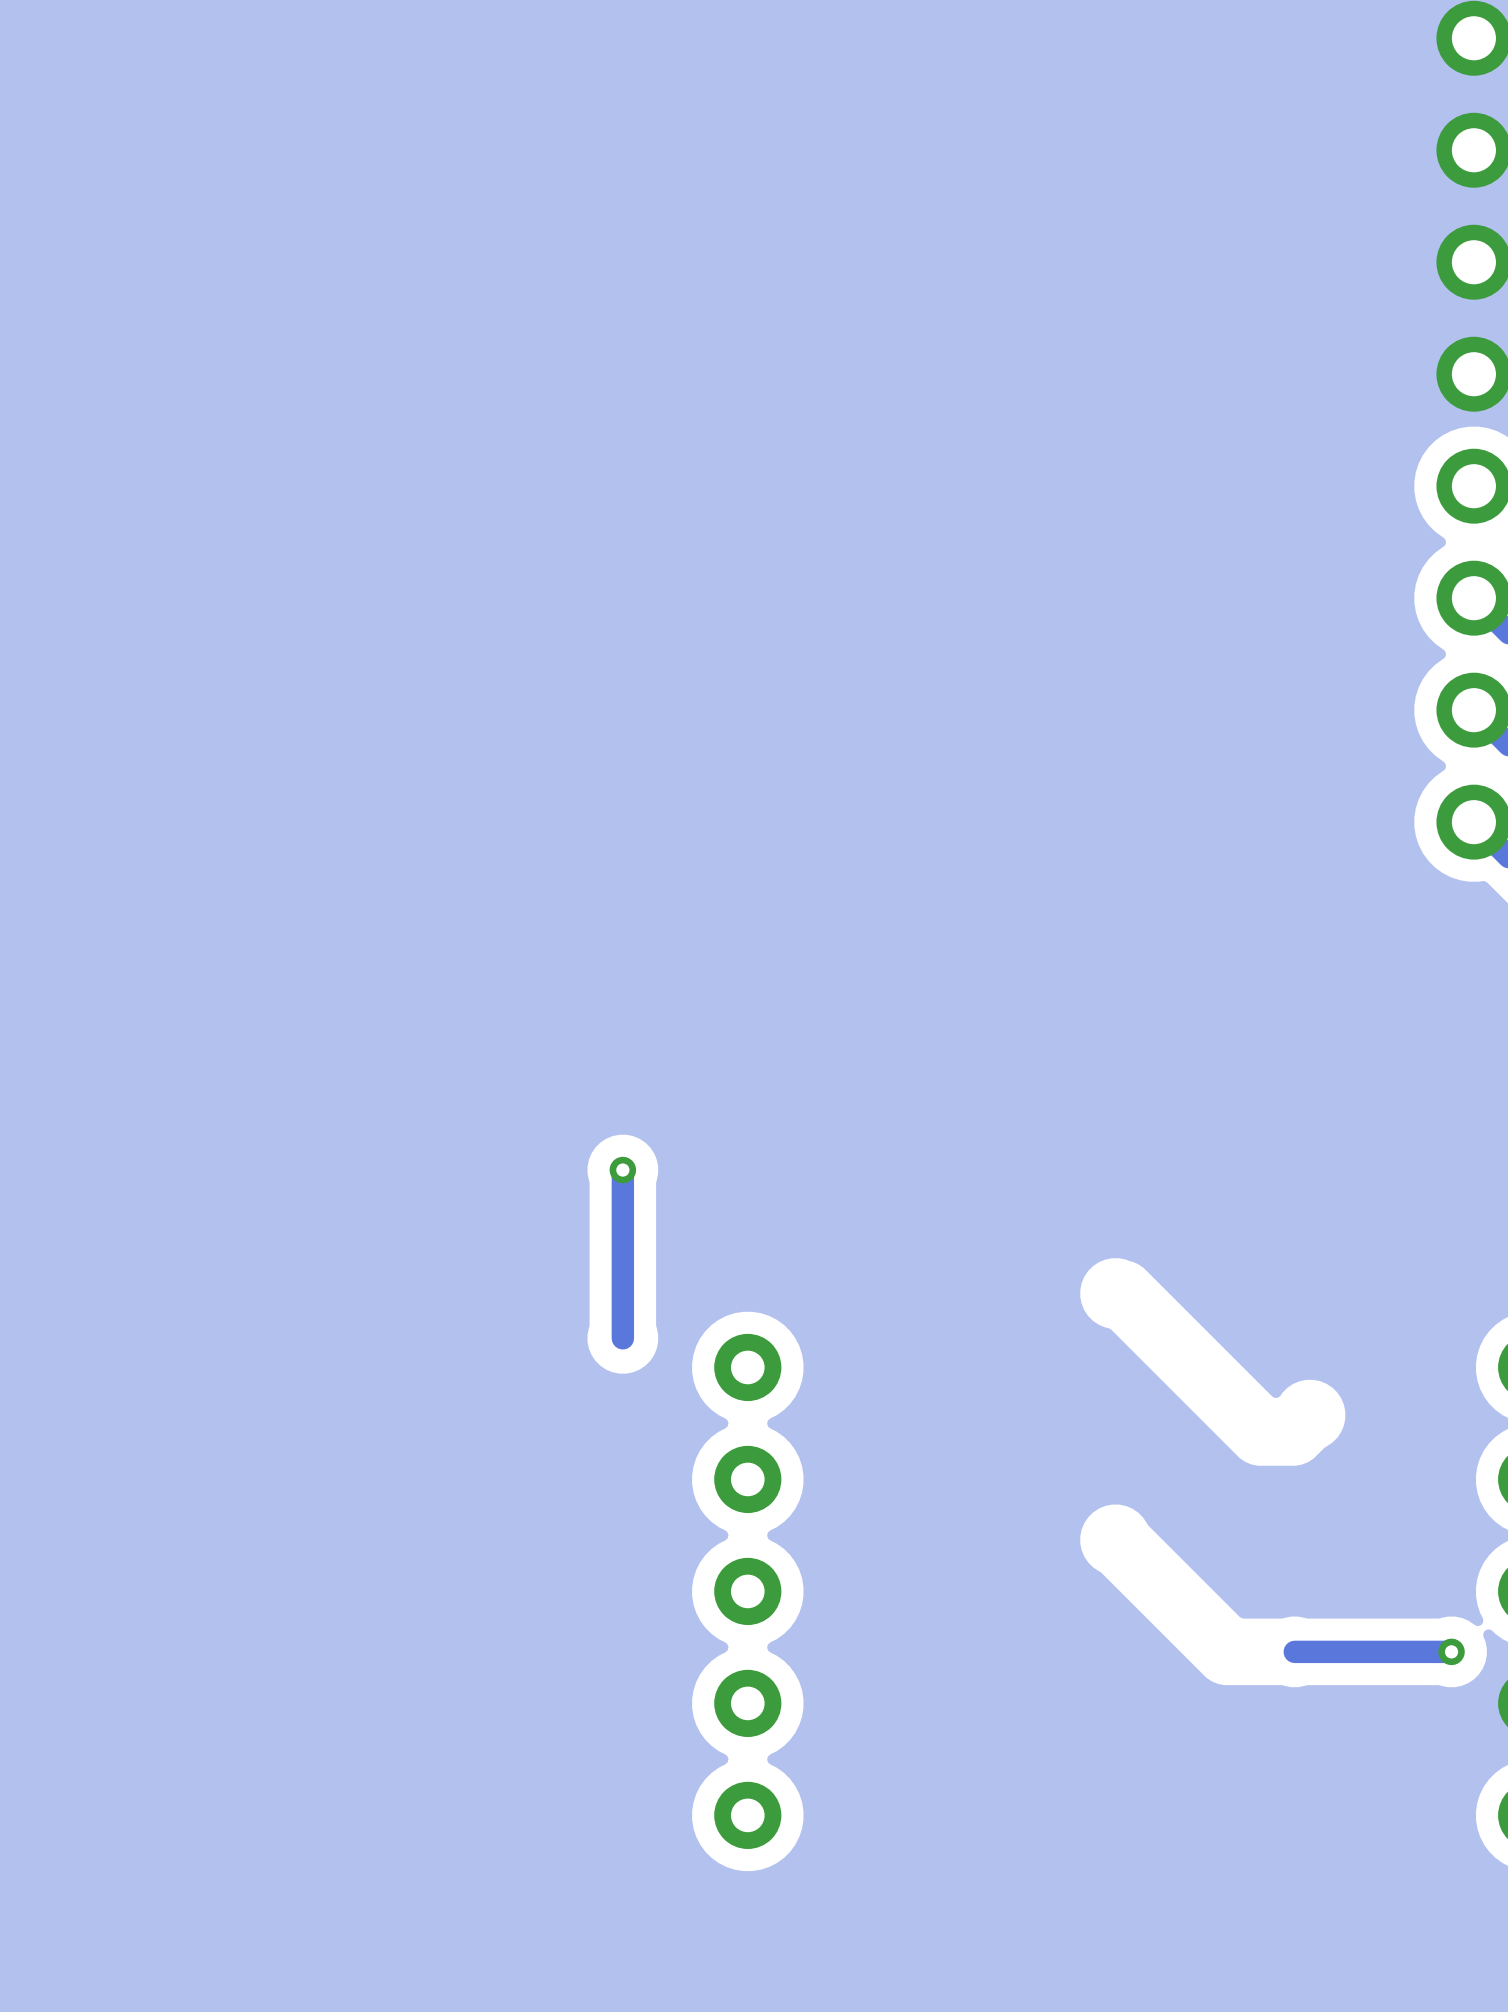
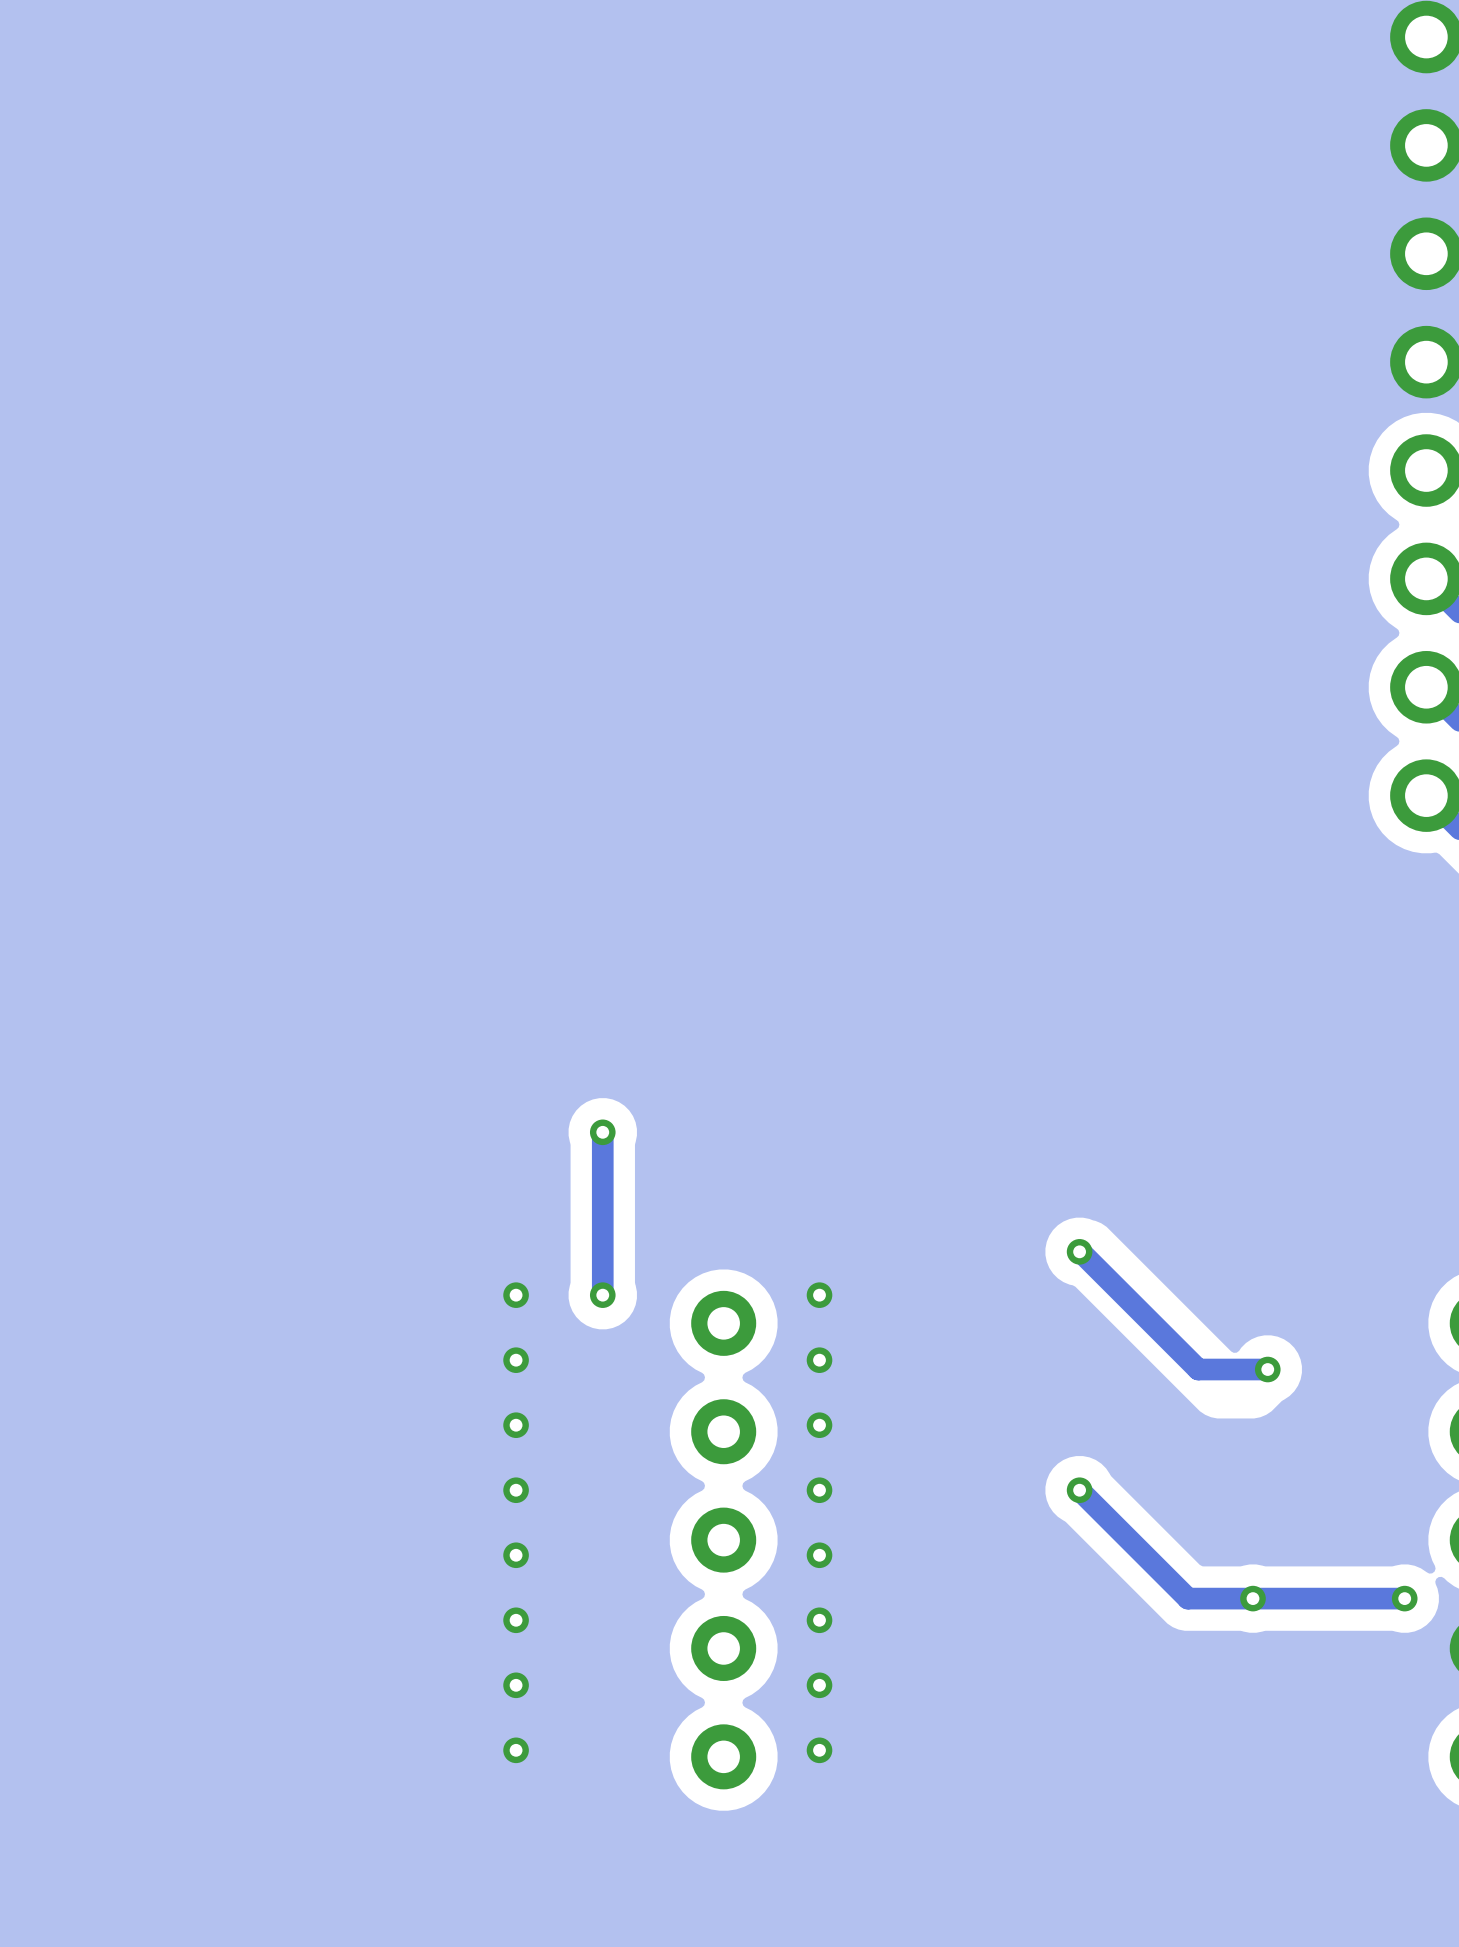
track: none -> (1079, 1251) (1198, 1369) (1267, 1369)
via: none -> (1079, 1251)
via: none -> (516, 1295)
via: none -> (602, 1295)
via: none -> (819, 1295)
via: none -> (516, 1360)
via: none -> (819, 1360)
via: none -> (1267, 1369)
via: none -> (516, 1425)
via: none -> (819, 1425)
via: none -> (516, 1490)
via: none -> (819, 1490)
track: none -> (1079, 1490) (1187, 1598) (1252, 1598)
via: none -> (1079, 1490)
via: none -> (516, 1555)
via: none -> (819, 1555)
via: none -> (1252, 1598)
via: none -> (516, 1620)
via: none -> (819, 1620)
via: none -> (516, 1685)
via: none -> (819, 1685)
via: none -> (516, 1750)
via: none -> (819, 1750)

